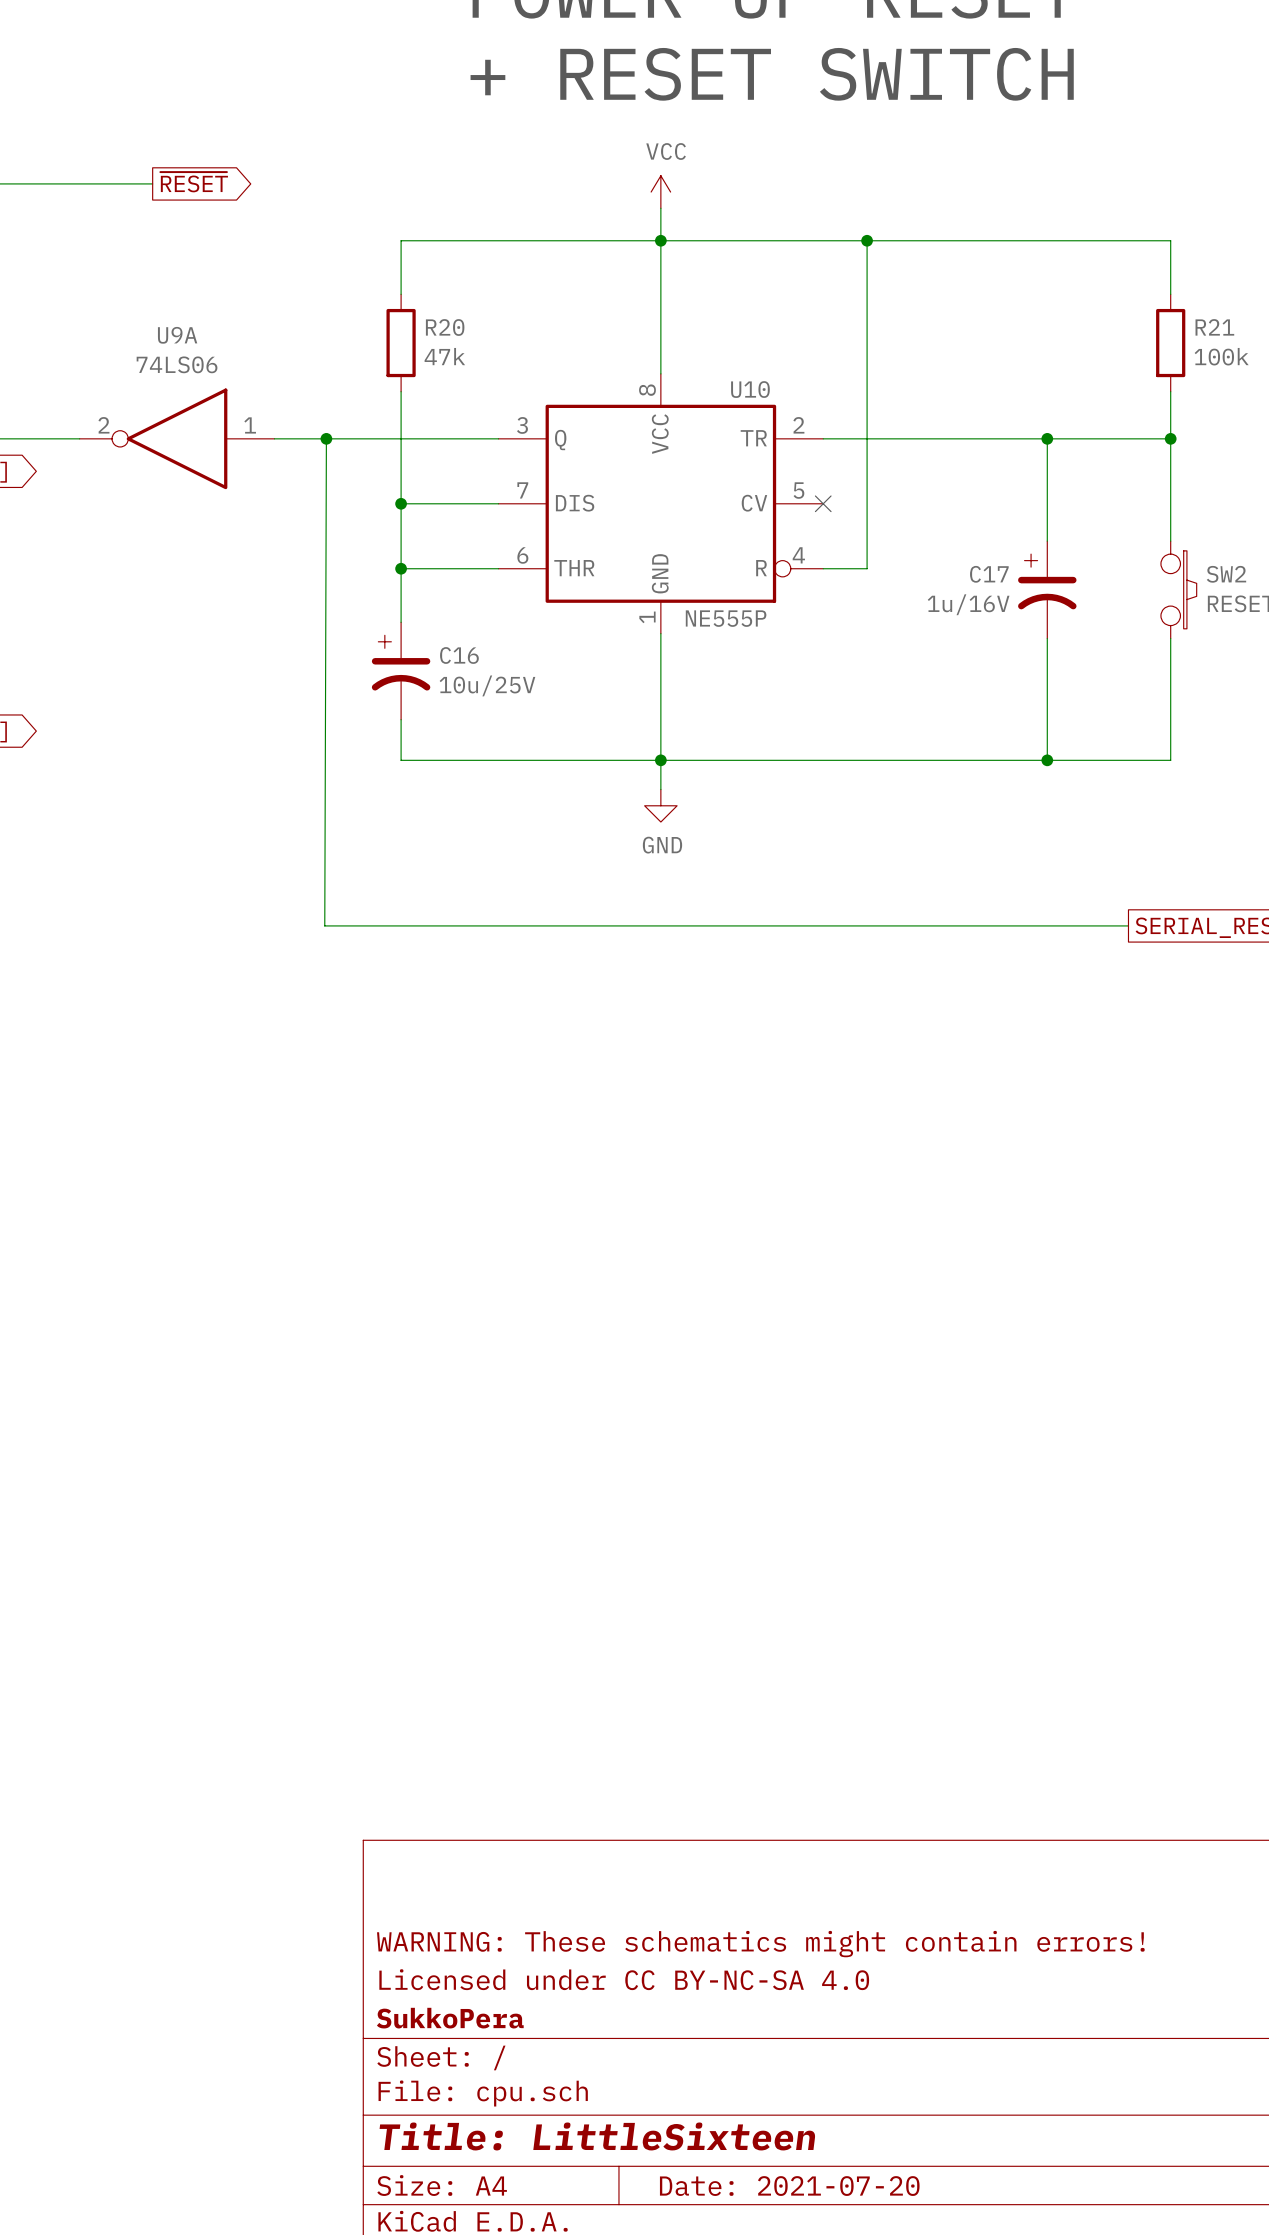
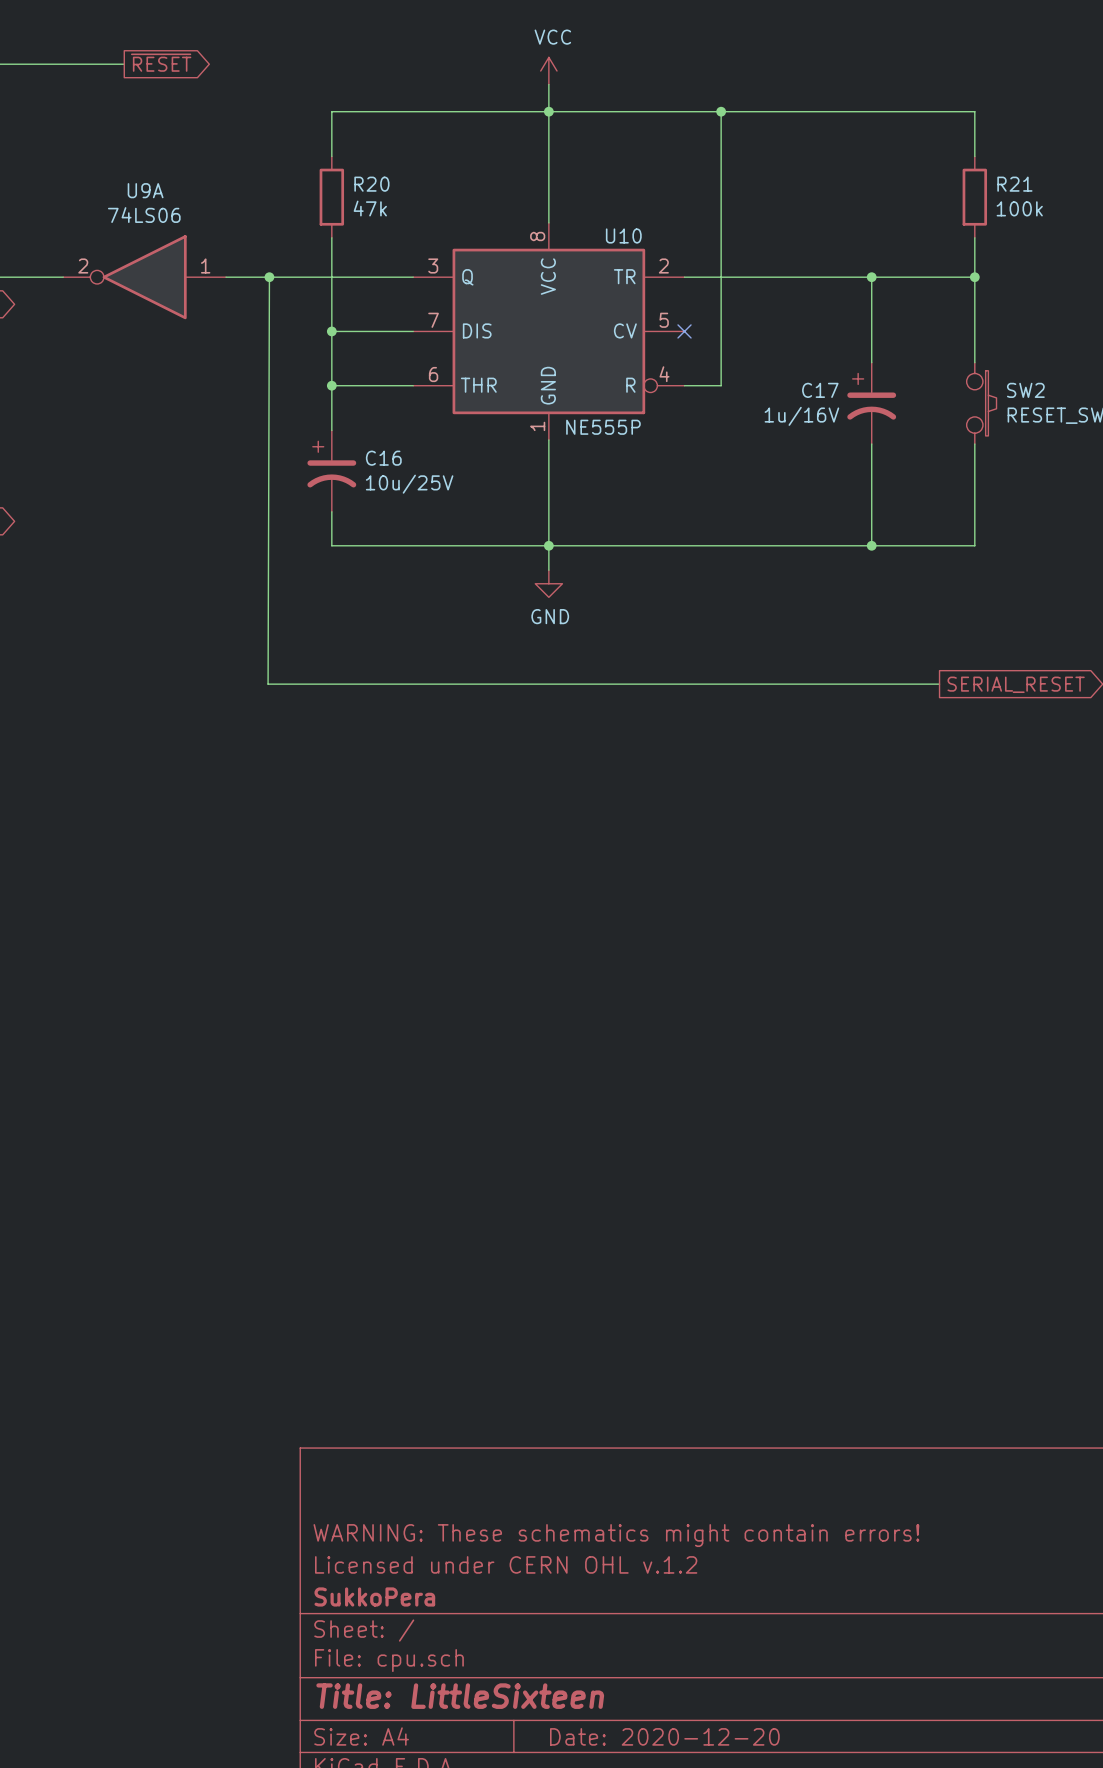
title block: Licensed under CC BY-NC-SA 4.0 (624, 1979) -> Licensed under CERN OHL v.1.2 (506, 1564)
title block: Date: 2021-07-20 (789, 2186) -> Date: 2020-12-20 (664, 1736)

